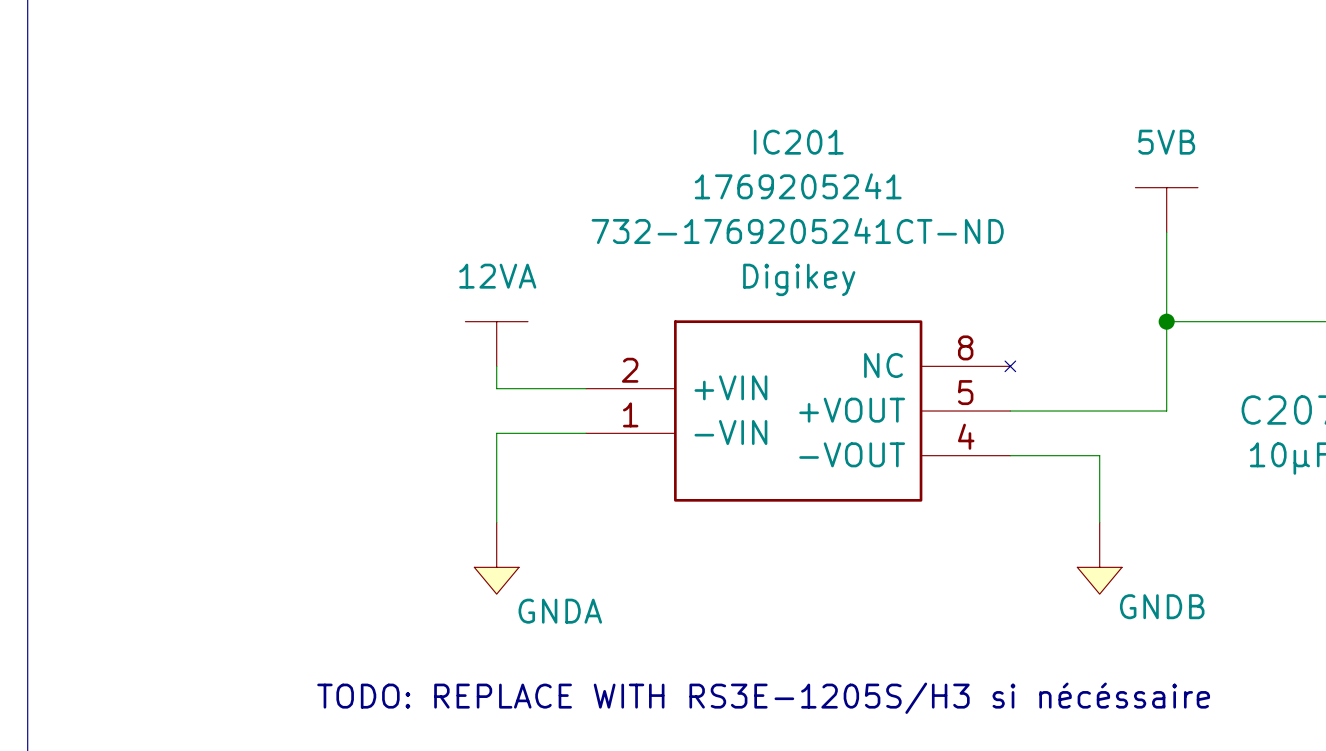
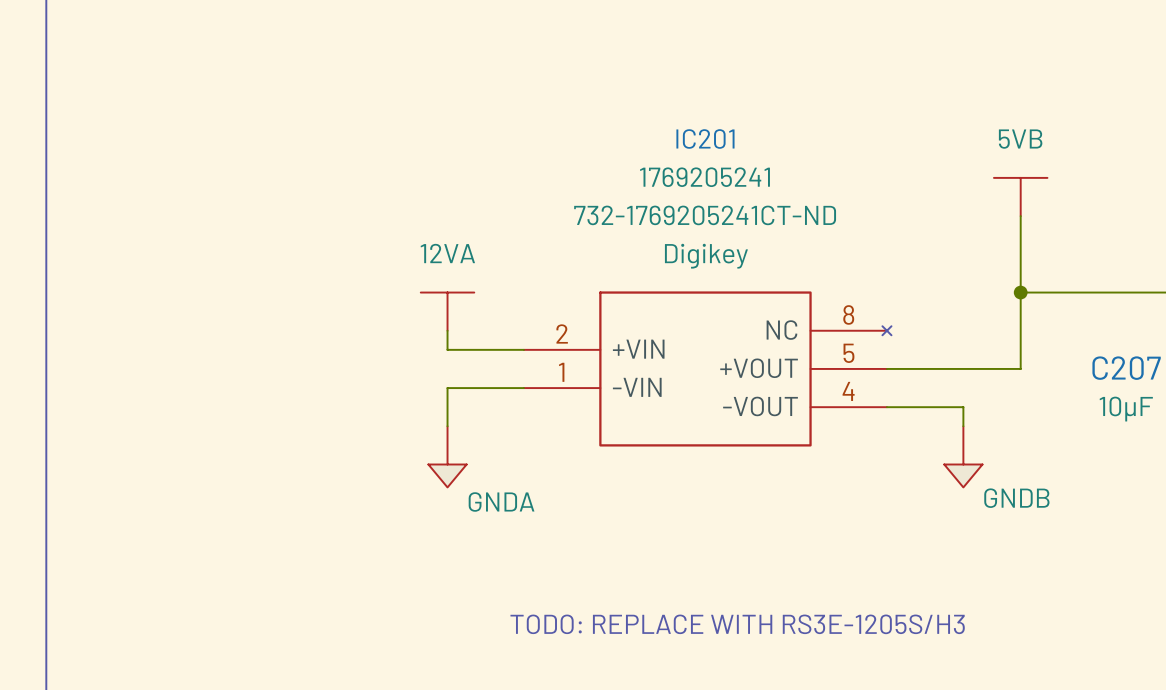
power symbol position: GNDA (496, 558) -> GNDA (447, 456)
power symbol position: GNDB (1099, 558) -> GNDB (963, 456)
text: TODO: REPLACE WITH RS3E-1205S/H3 si nécéssaire (763, 698) -> TODO: REPLACE WITH RS3E-1205S/H3 (737, 624)

